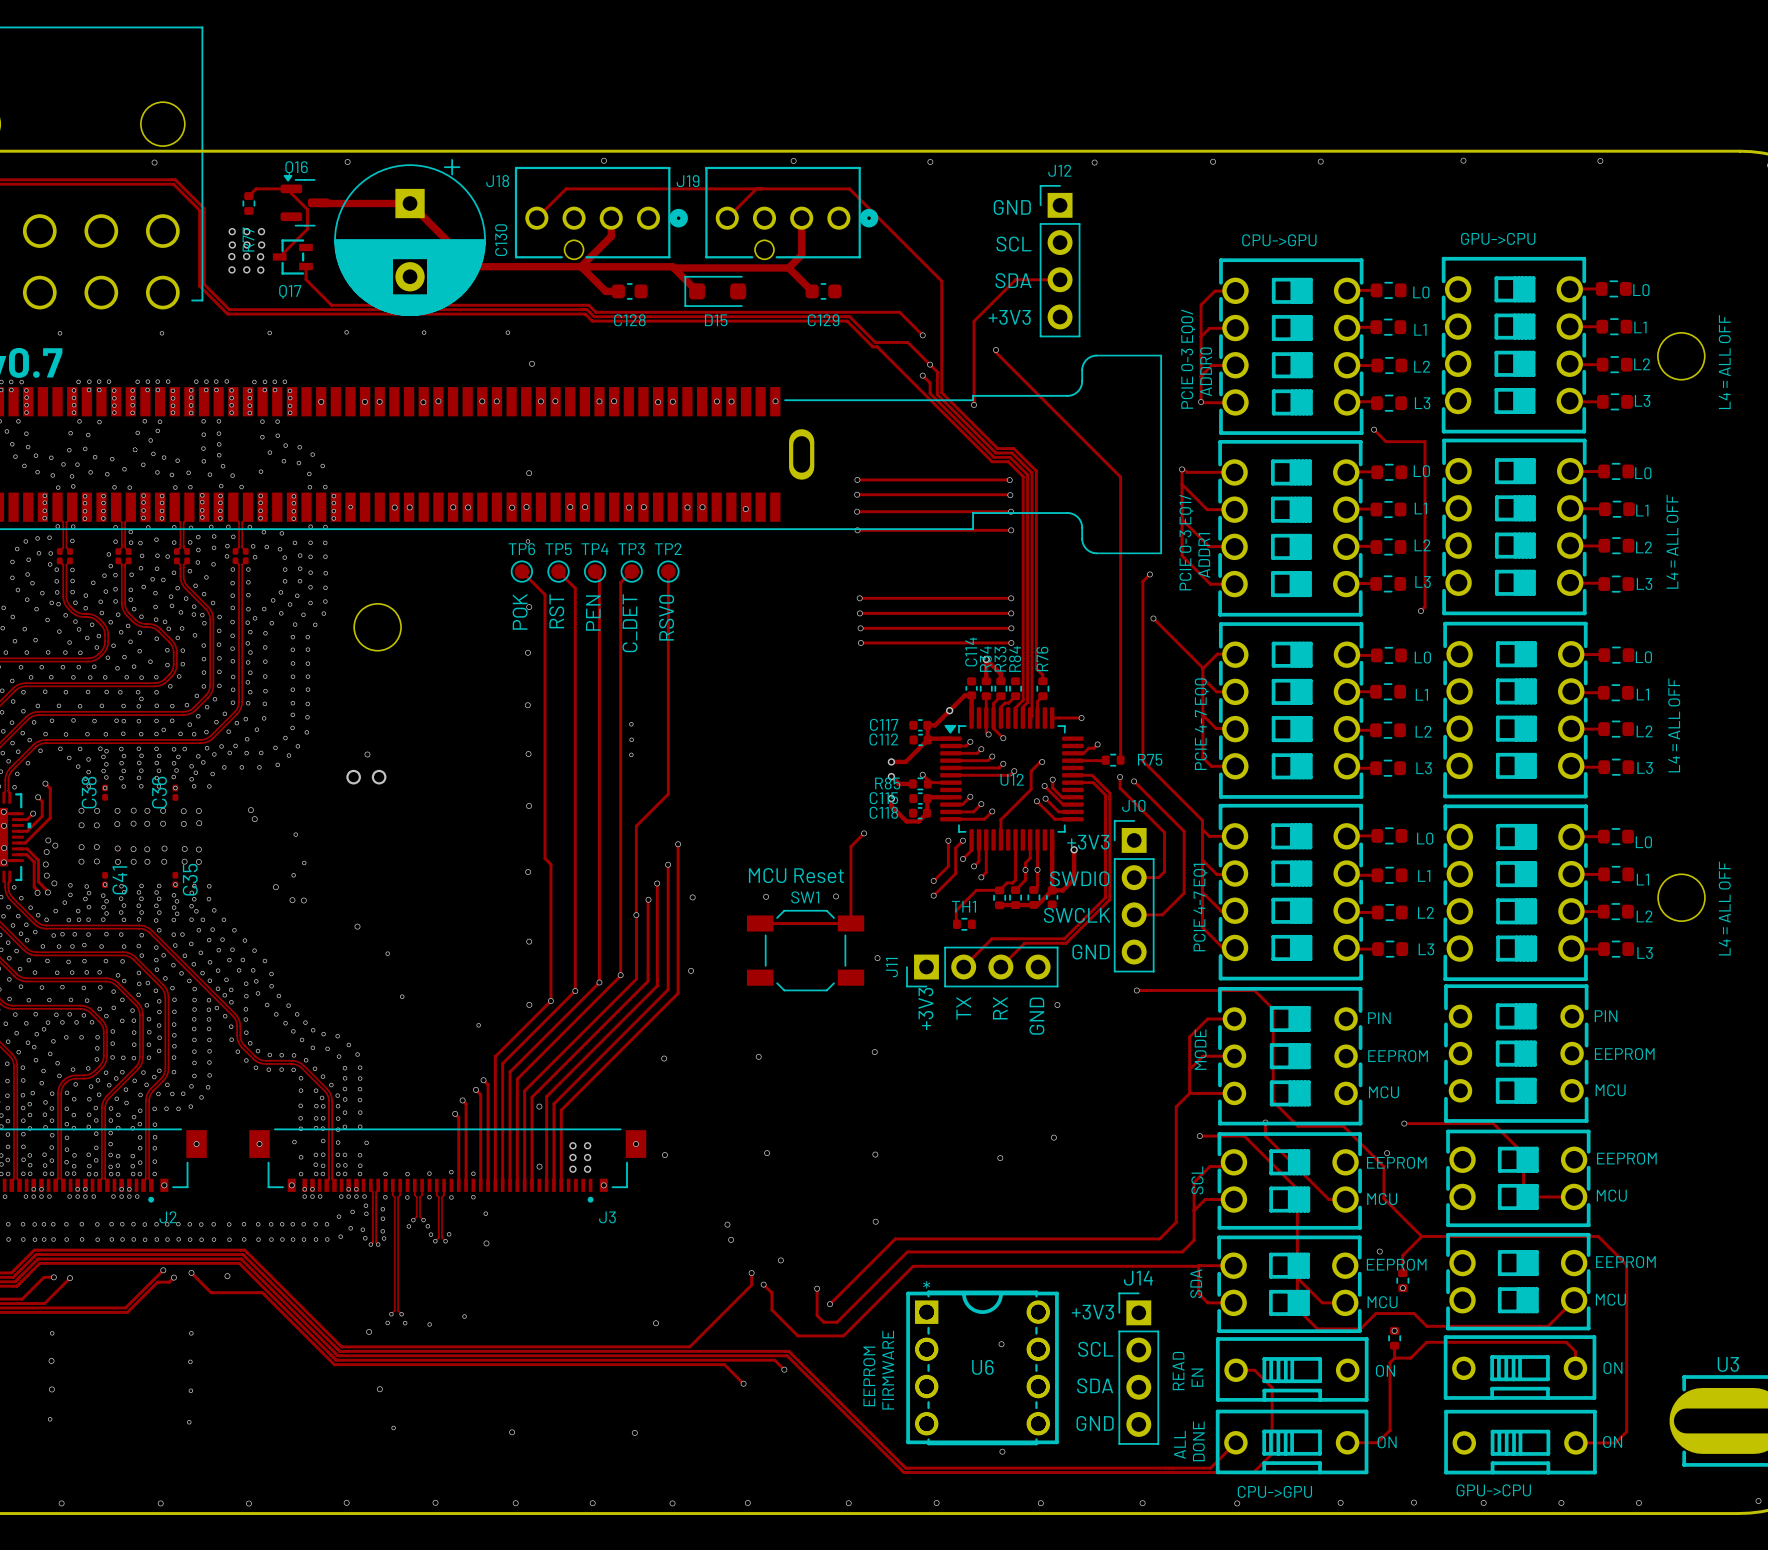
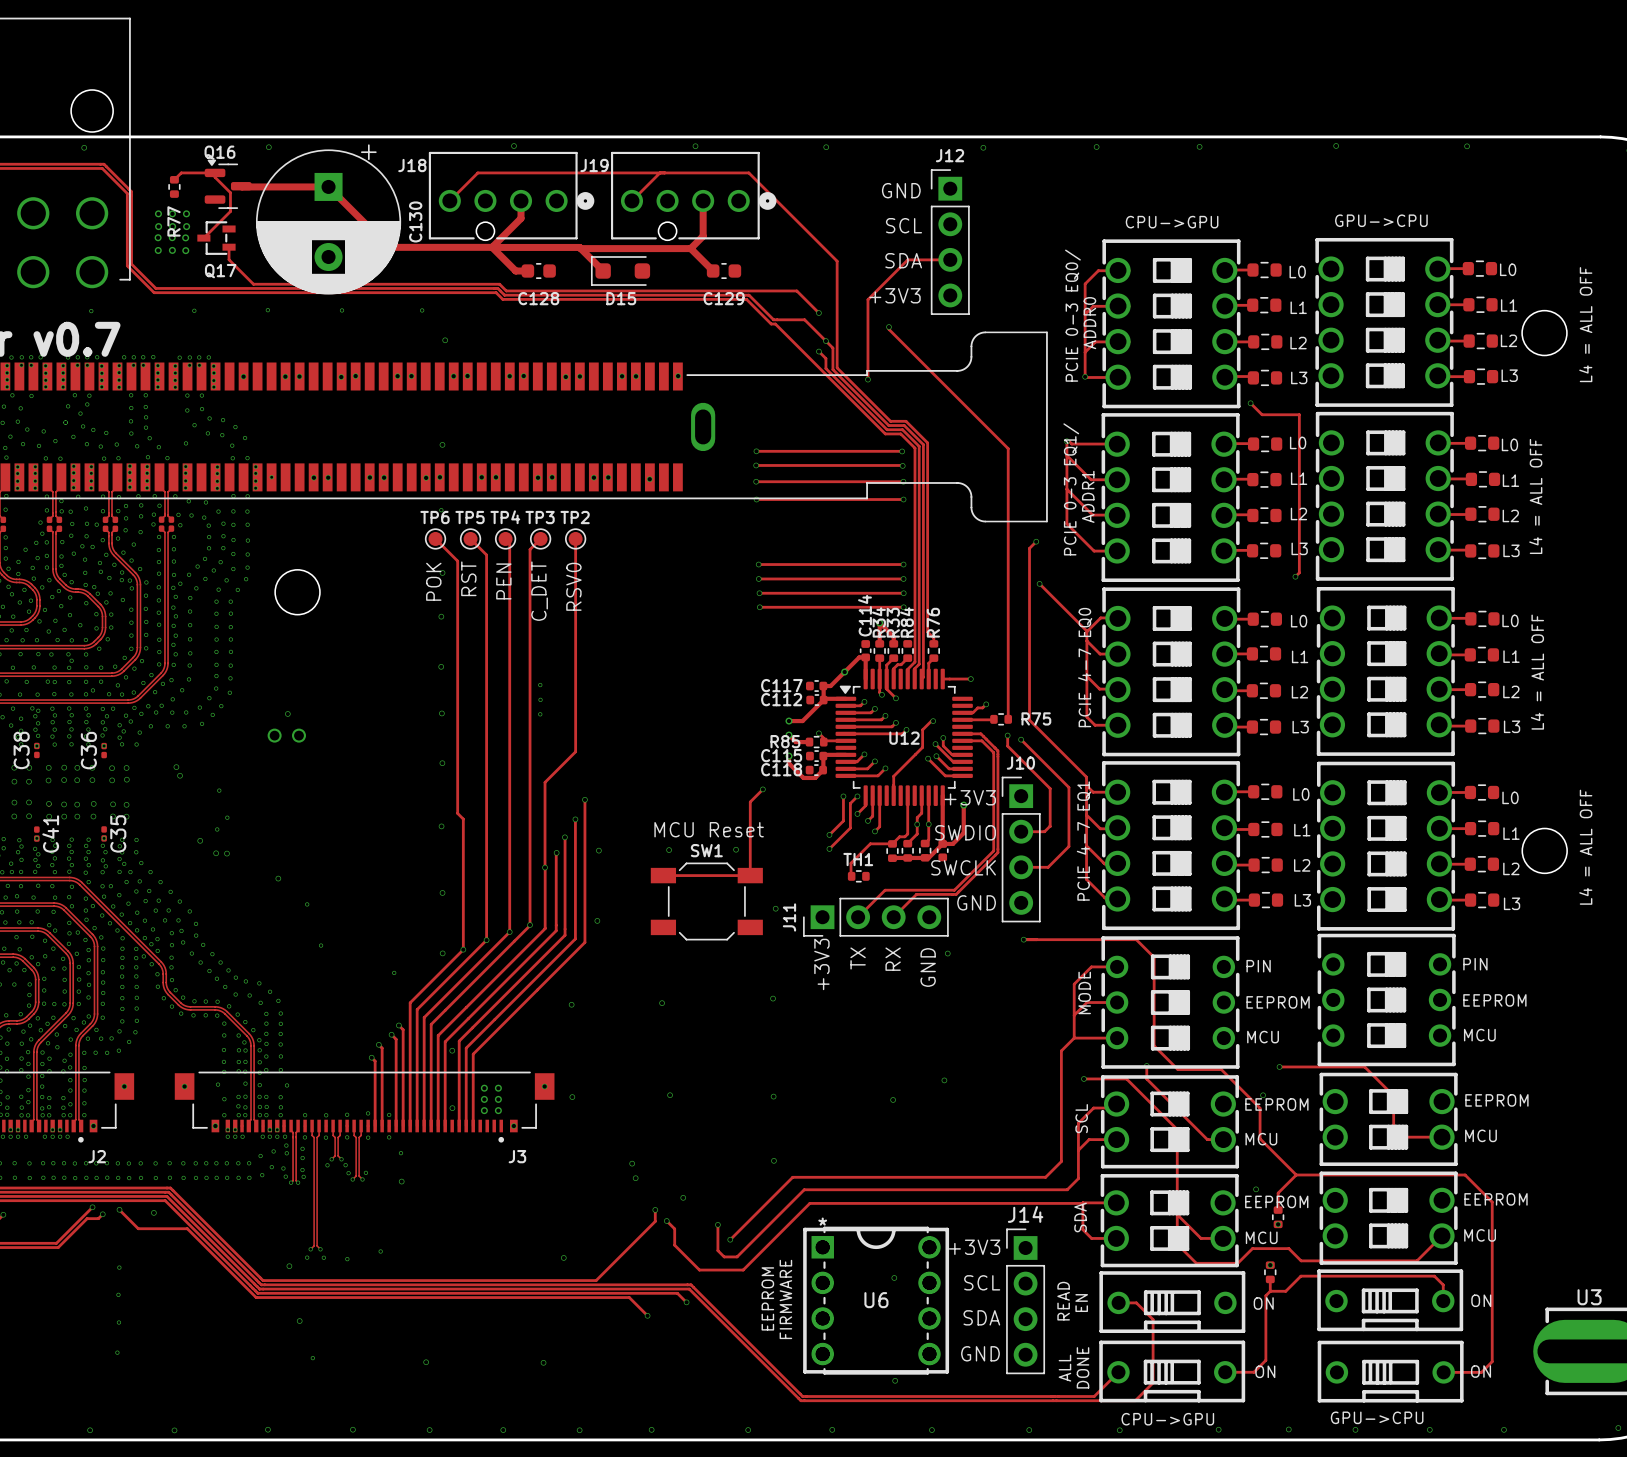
via: none -> (102, 845)
via: (173, 895) -> none
via: none -> (105, 852)
via: (176, 901) -> none

